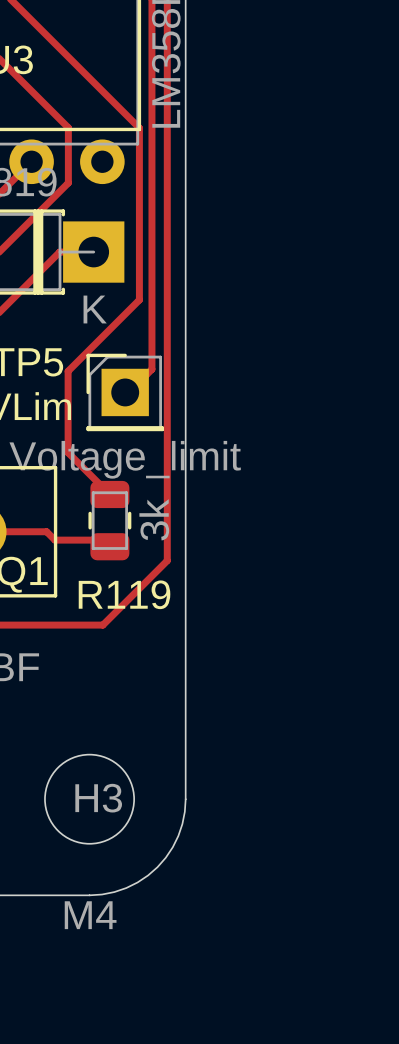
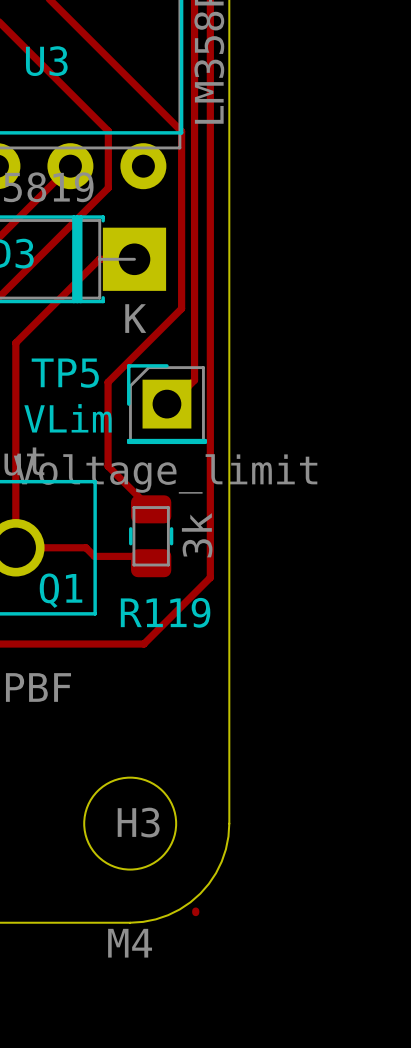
track: none -> (195, 911) (195, 912)

